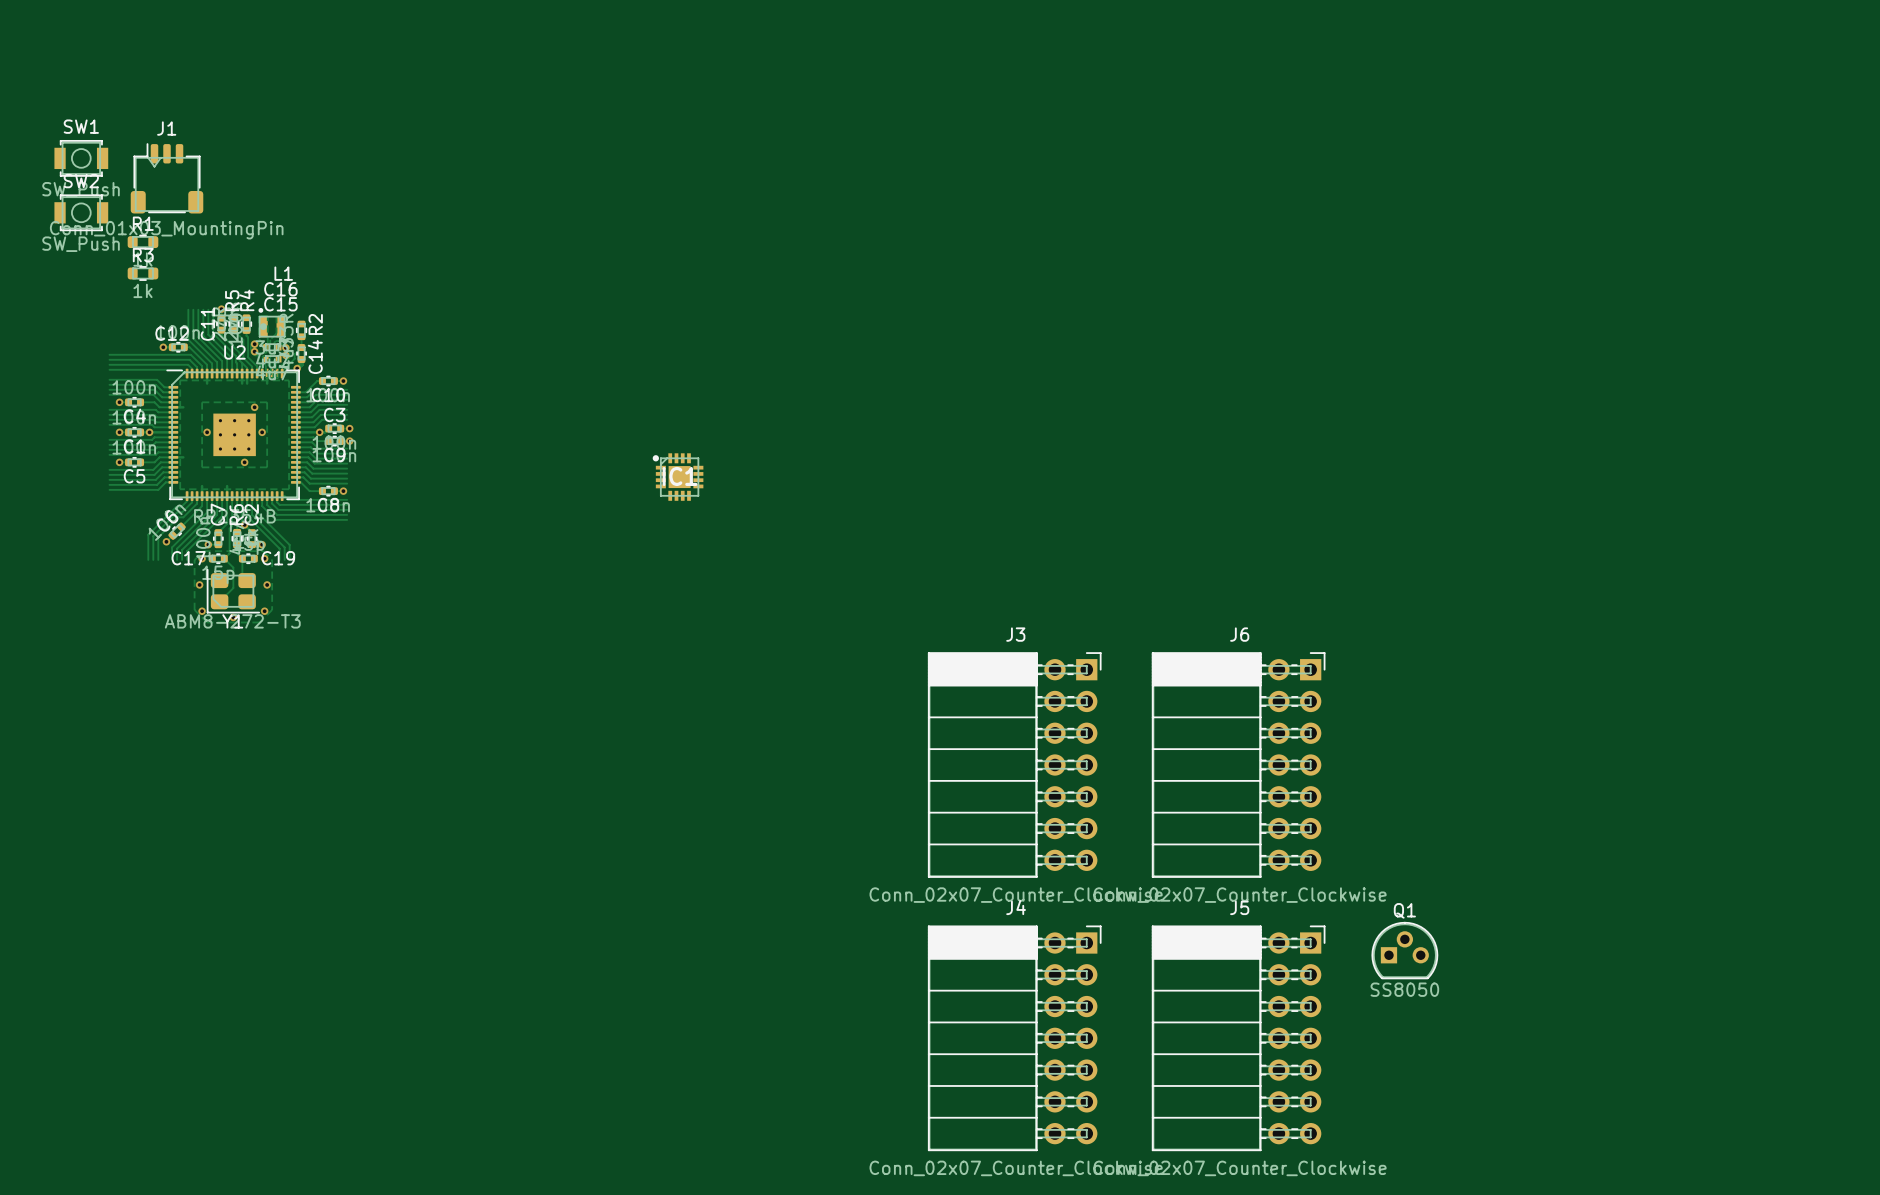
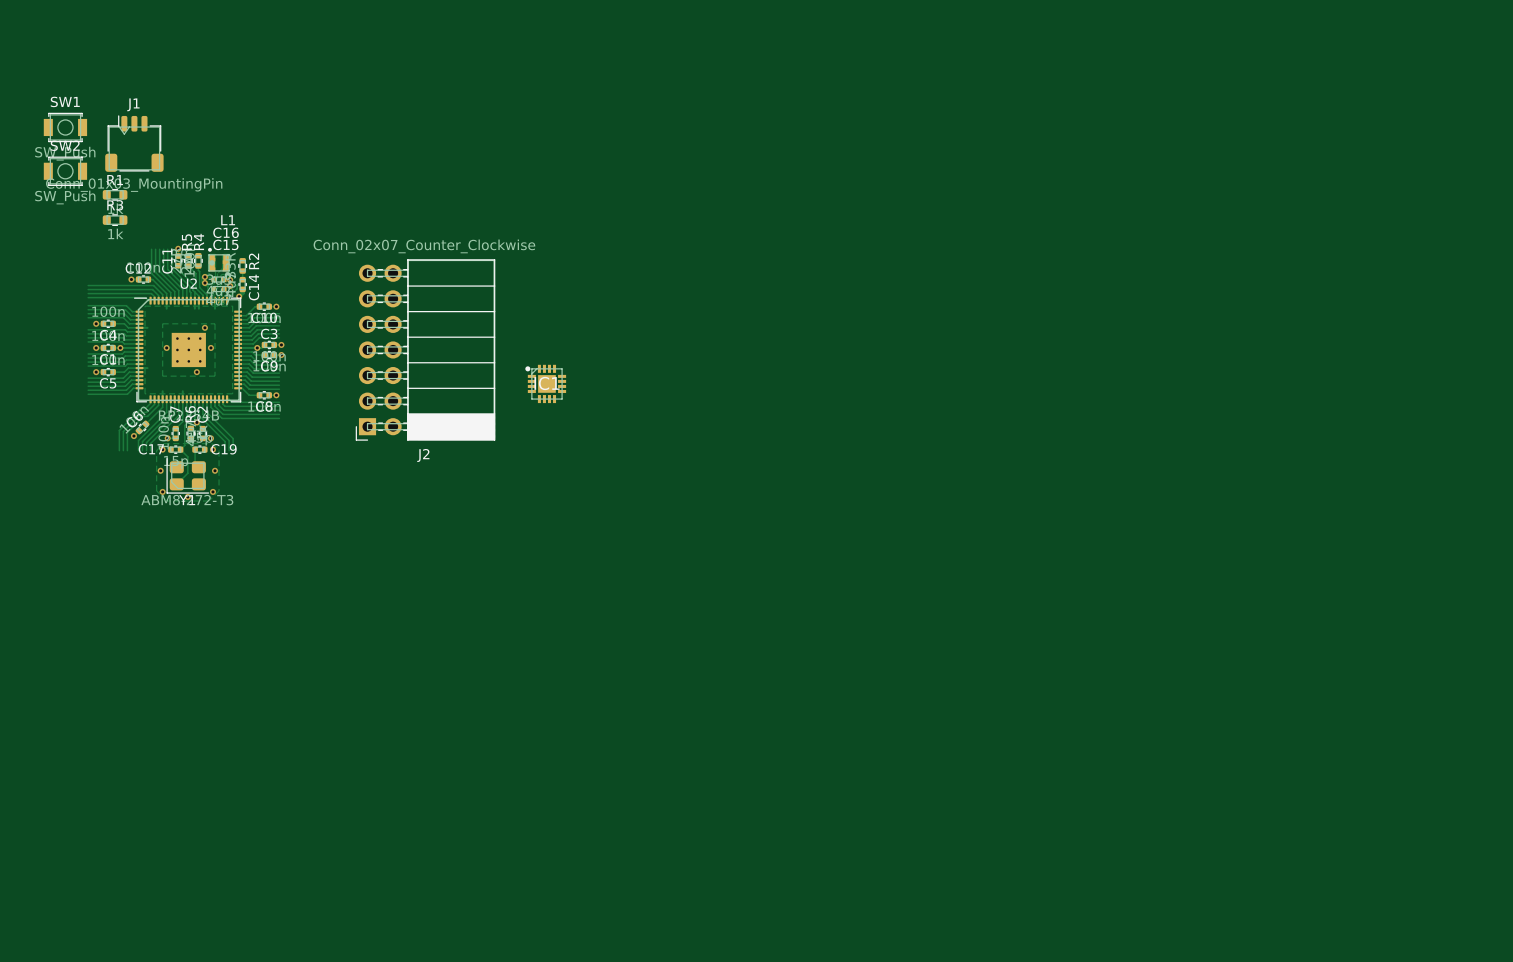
J2: none -> Conn_02x07_Counter_Clockwise (425, 349)
J3: Conn_02x07_Counter_Clockwise (1014, 765) -> none
J6: Conn_02x07_Counter_Clockwise (1238, 765) -> none
Q1: SS8050 (1404, 950) -> none
J4: Conn_02x07_Counter_Clockwise (1014, 1038) -> none
J5: Conn_02x07_Counter_Clockwise (1238, 1038) -> none

